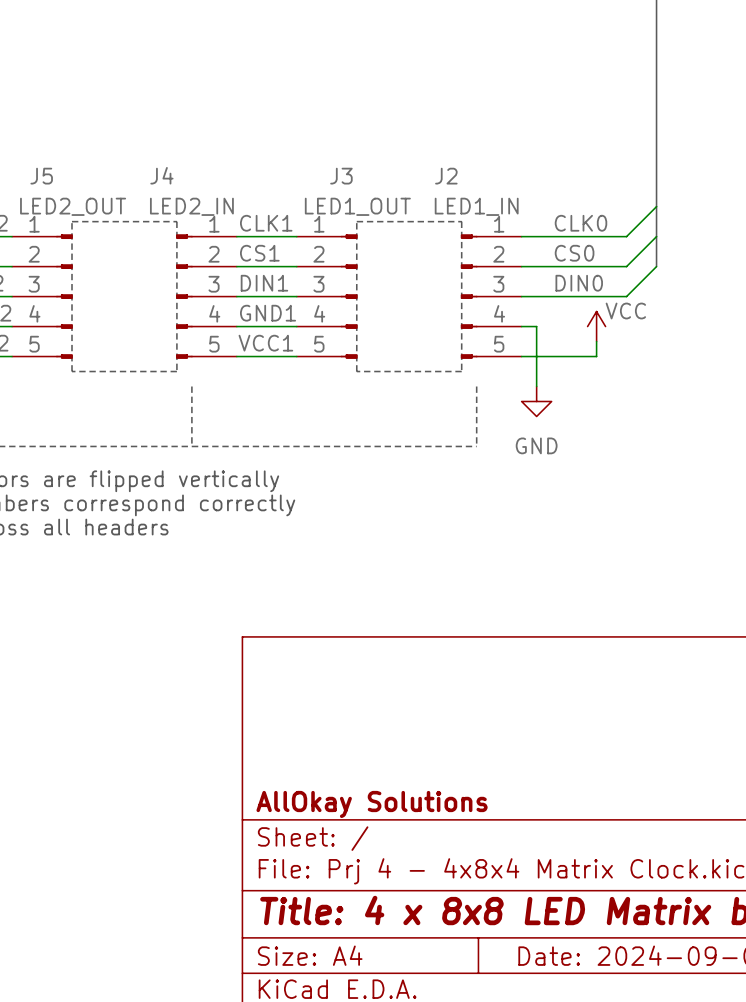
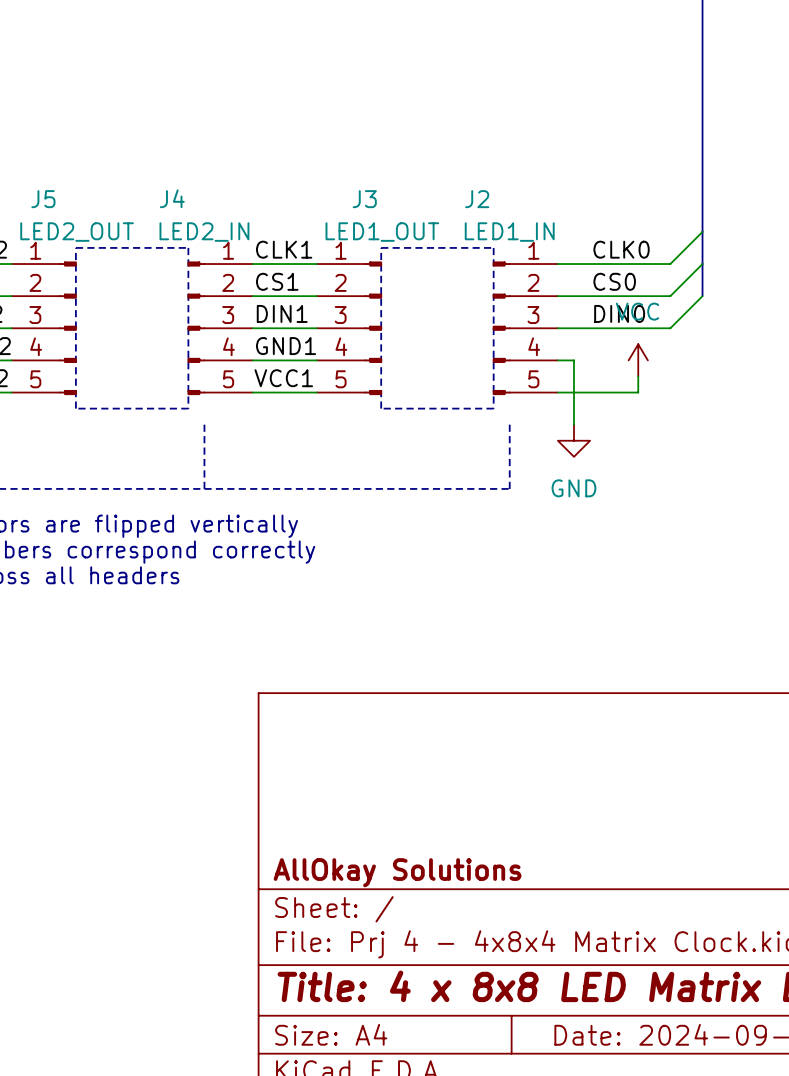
power symbol text position: VCC (625, 311) -> VCC (637, 311)

